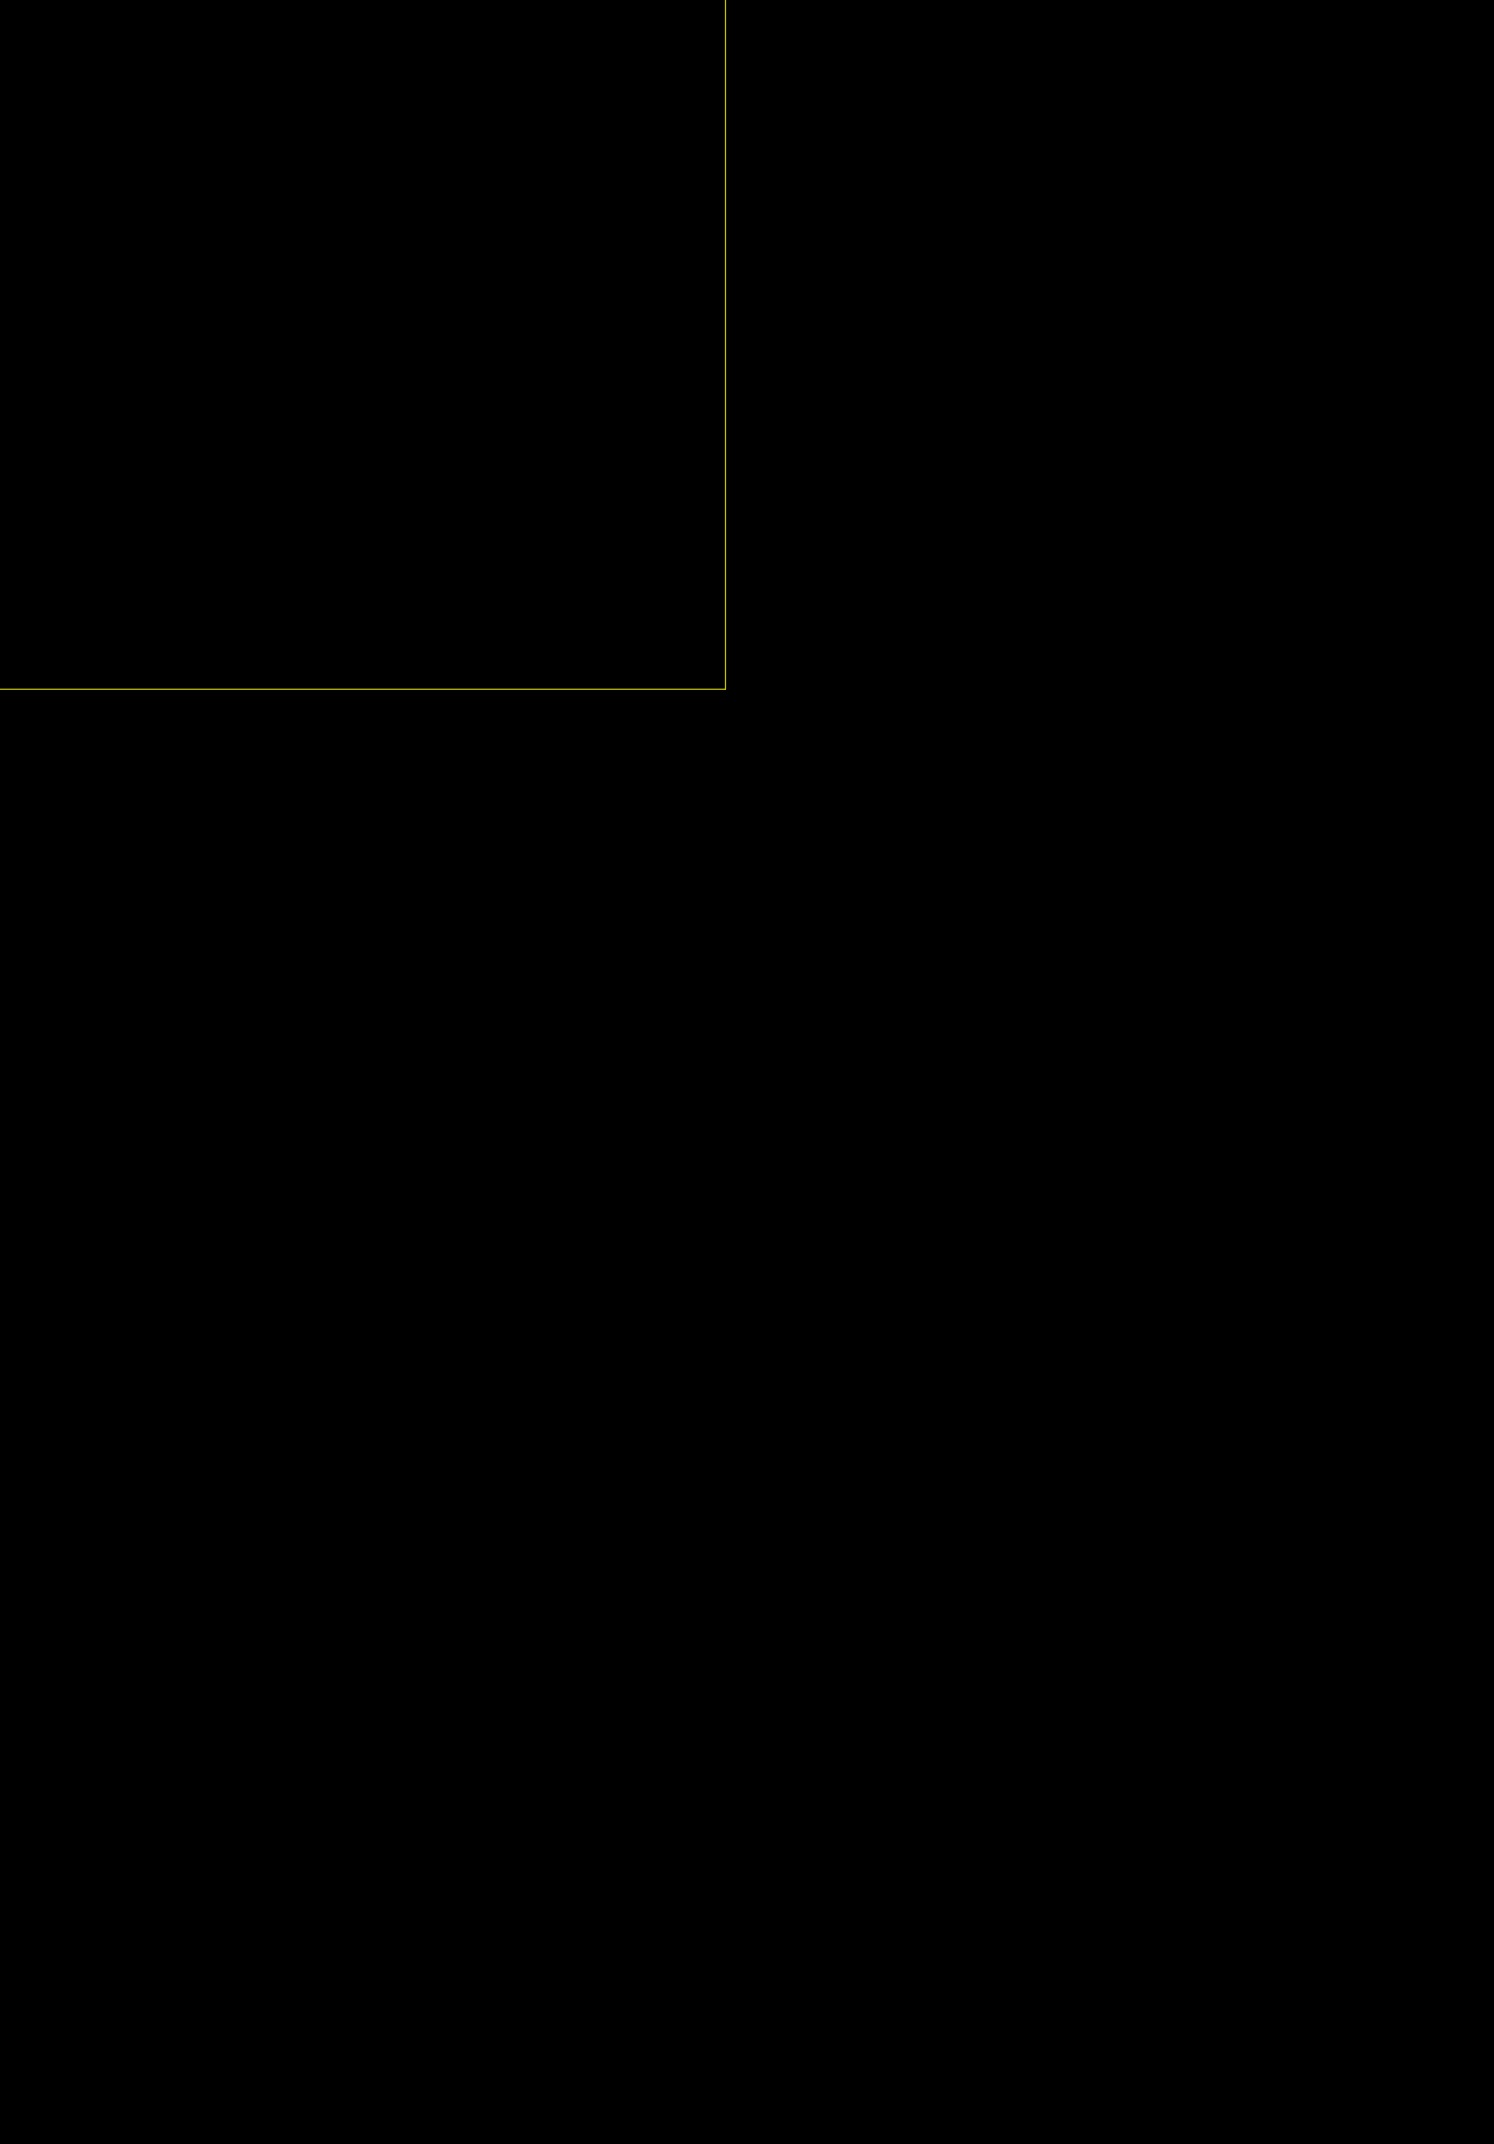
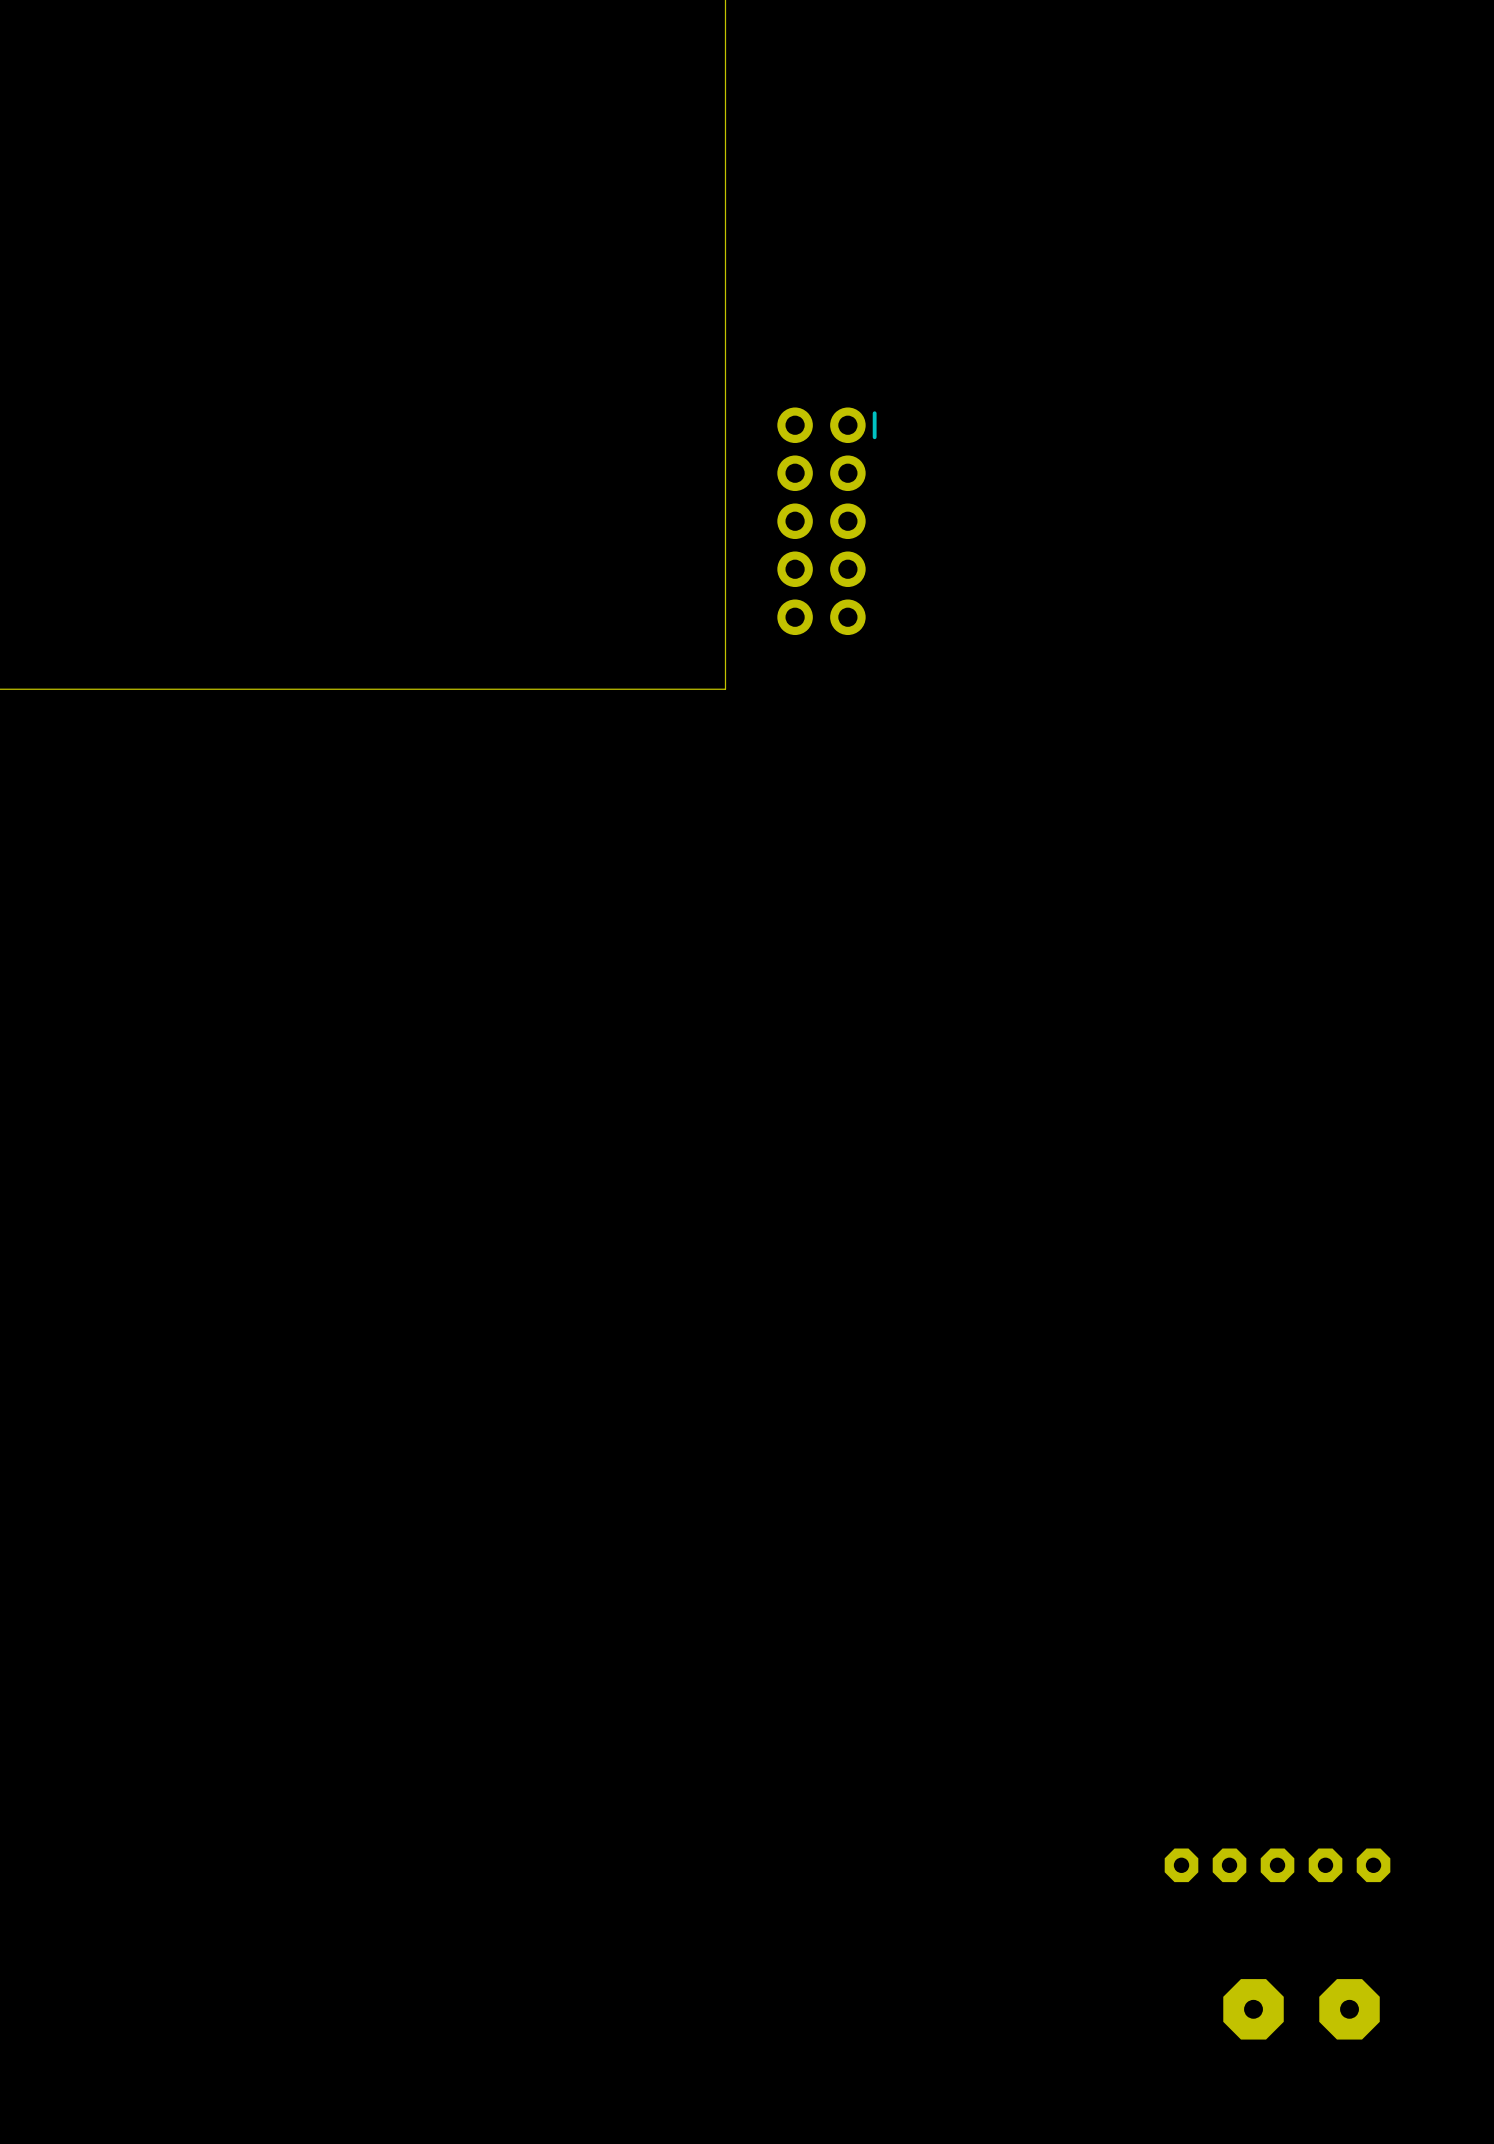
part: none -> (826, 521)
part: none -> (1277, 1865)
part: none -> (1301, 2009)

